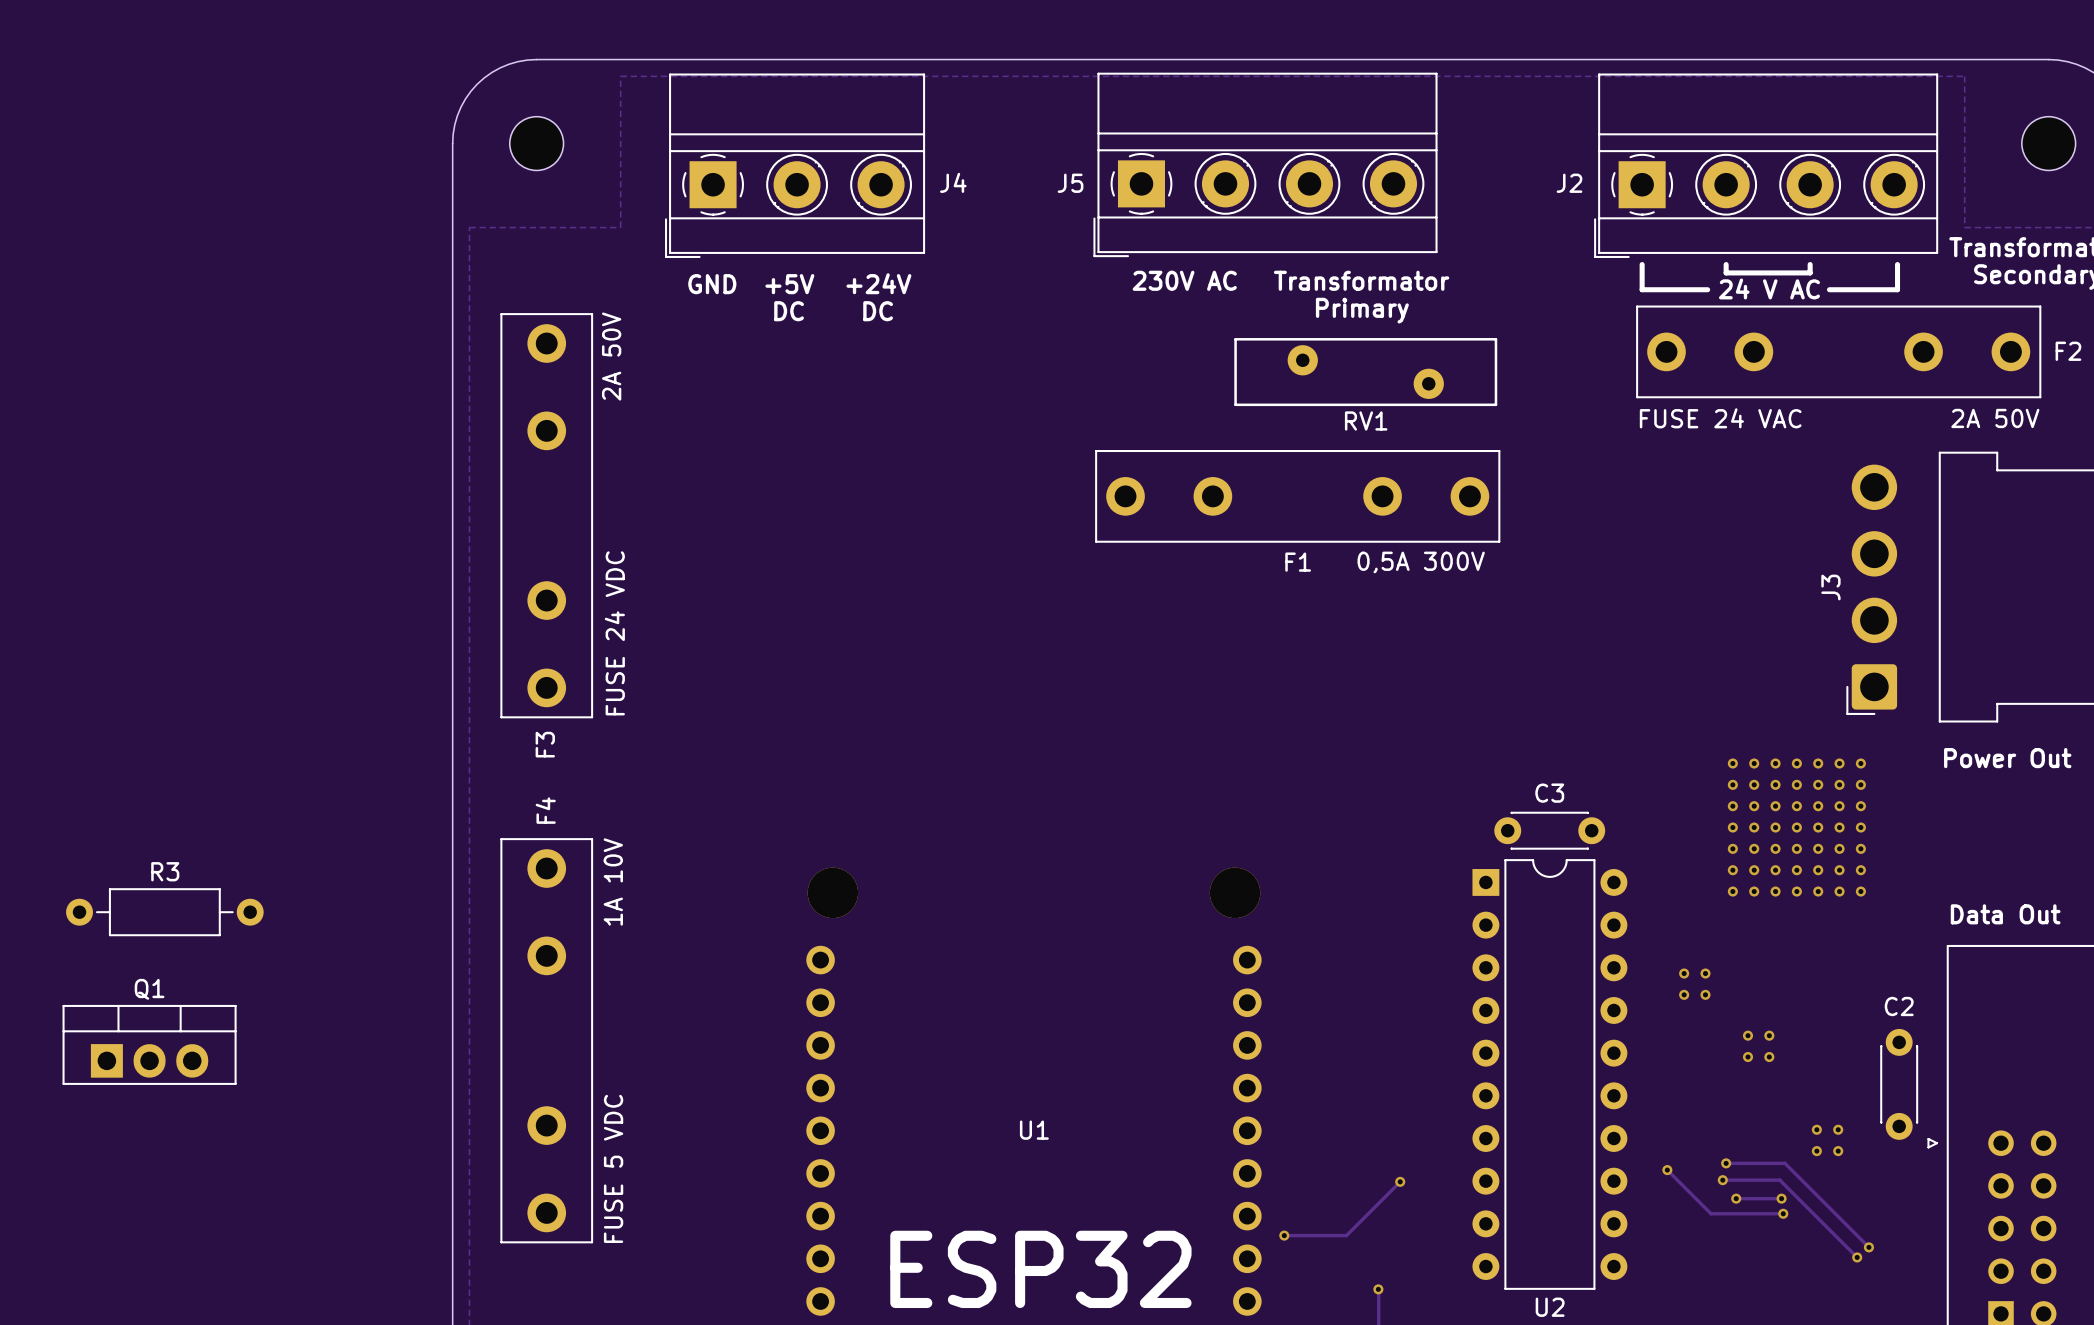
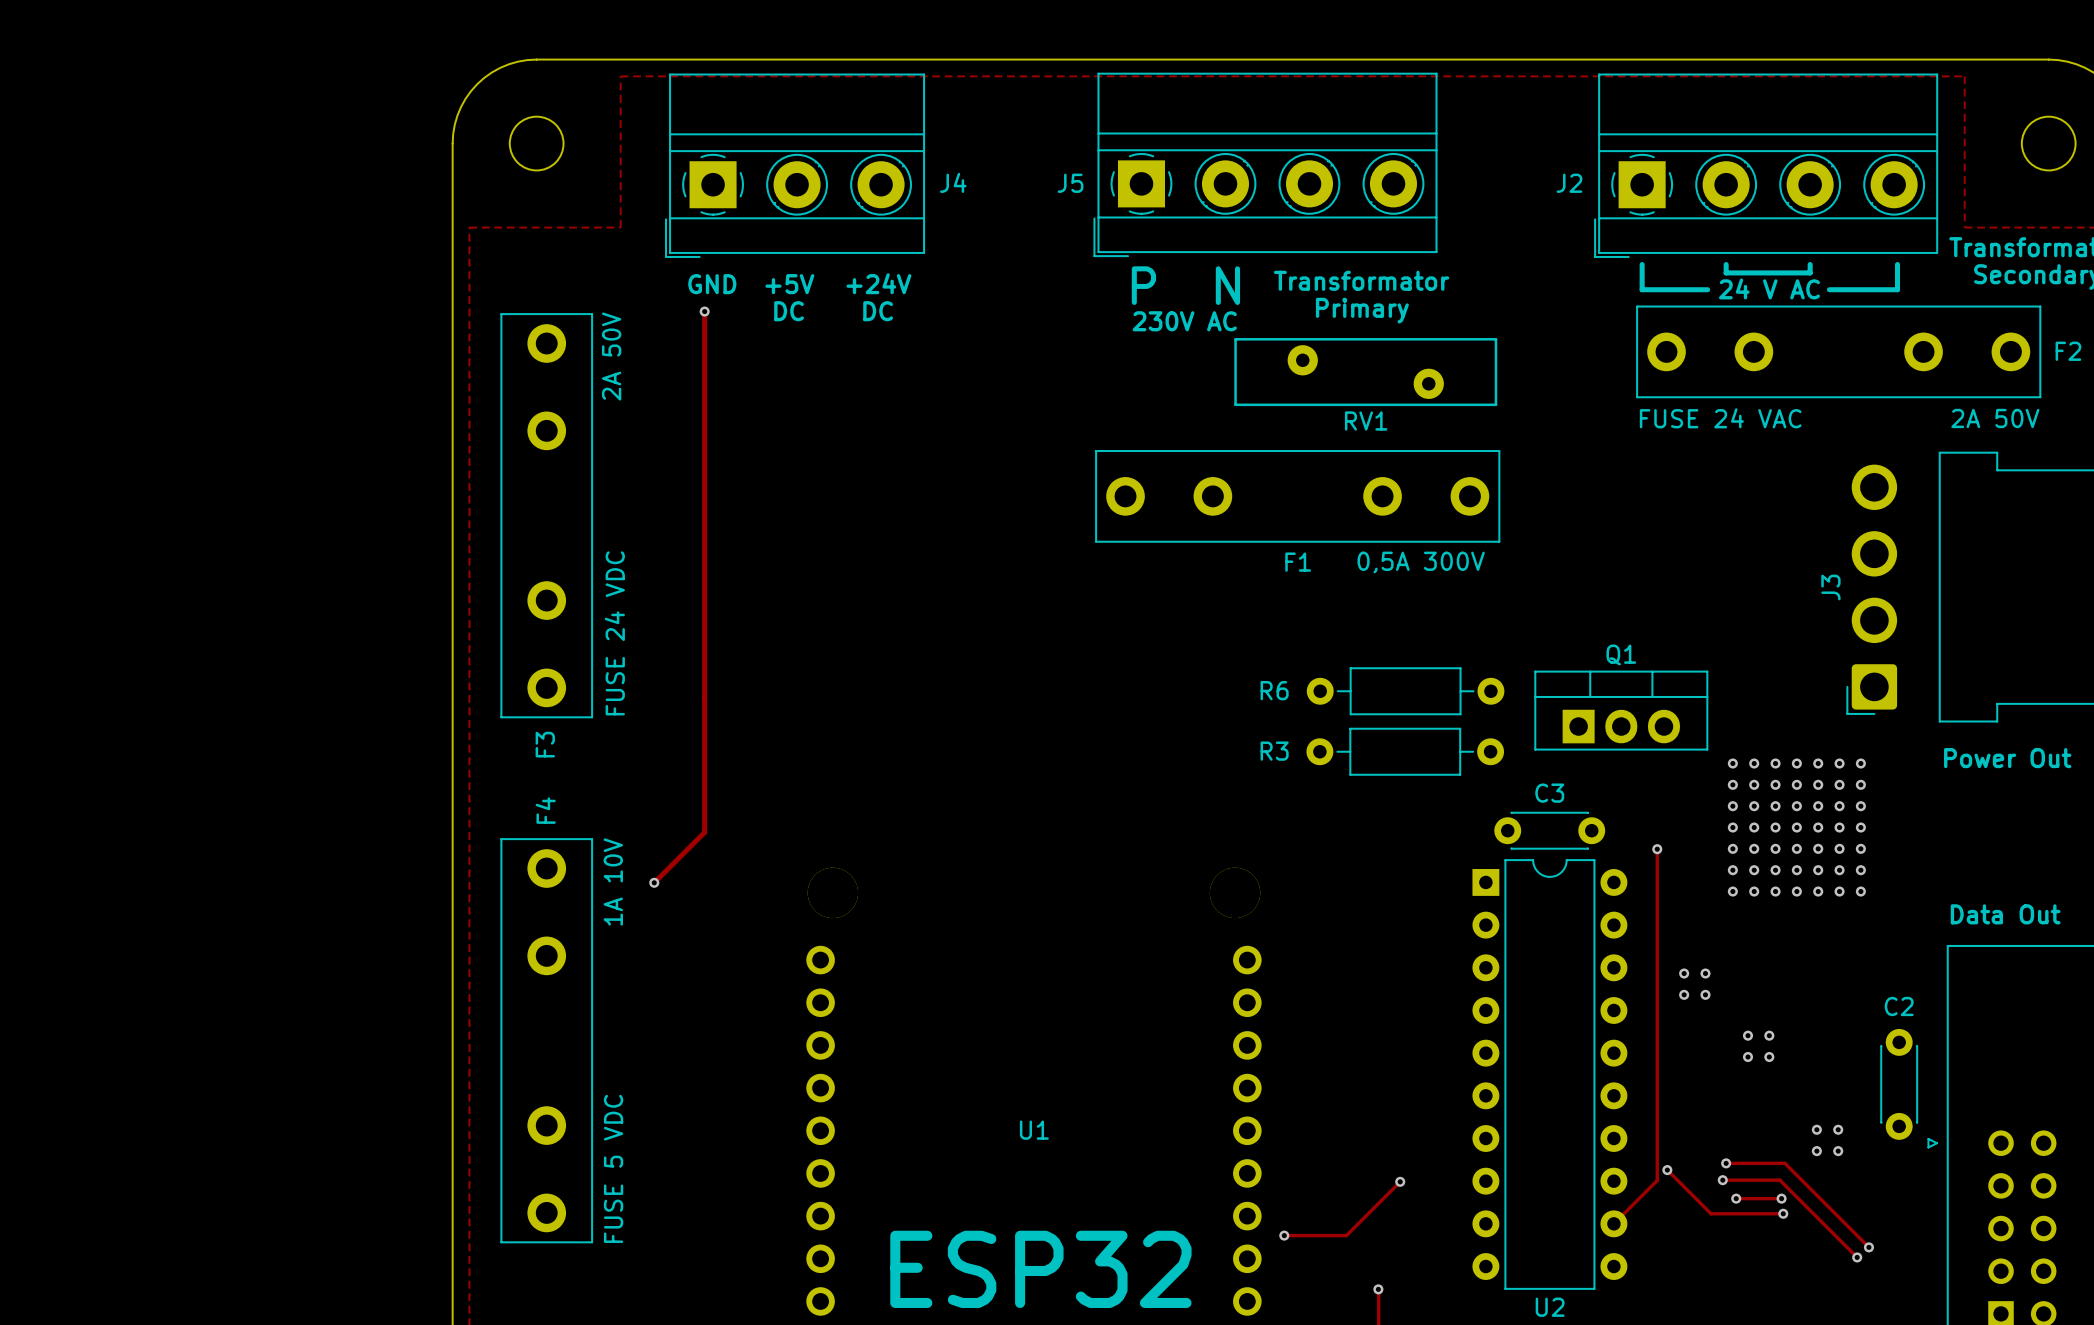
text position: 230V AC (1184, 280) -> 230V AC (1184, 321)
text: none -> P (1143, 285)
text: none -> N (1227, 285)
track: none -> (704, 311) (704, 832) (654, 882)
via: none -> (704, 311)
R6: none -> (1405, 691)
track: none -> (1657, 849) (1657, 1180) (1613, 1223)
via: none -> (1657, 849)
R3 name position: R3 (165, 871) -> R3 (1274, 751)
via: none -> (654, 882)
R3 position: (164, 912) -> (1405, 751)
Q1 position: (149, 1044) -> (1621, 710)

